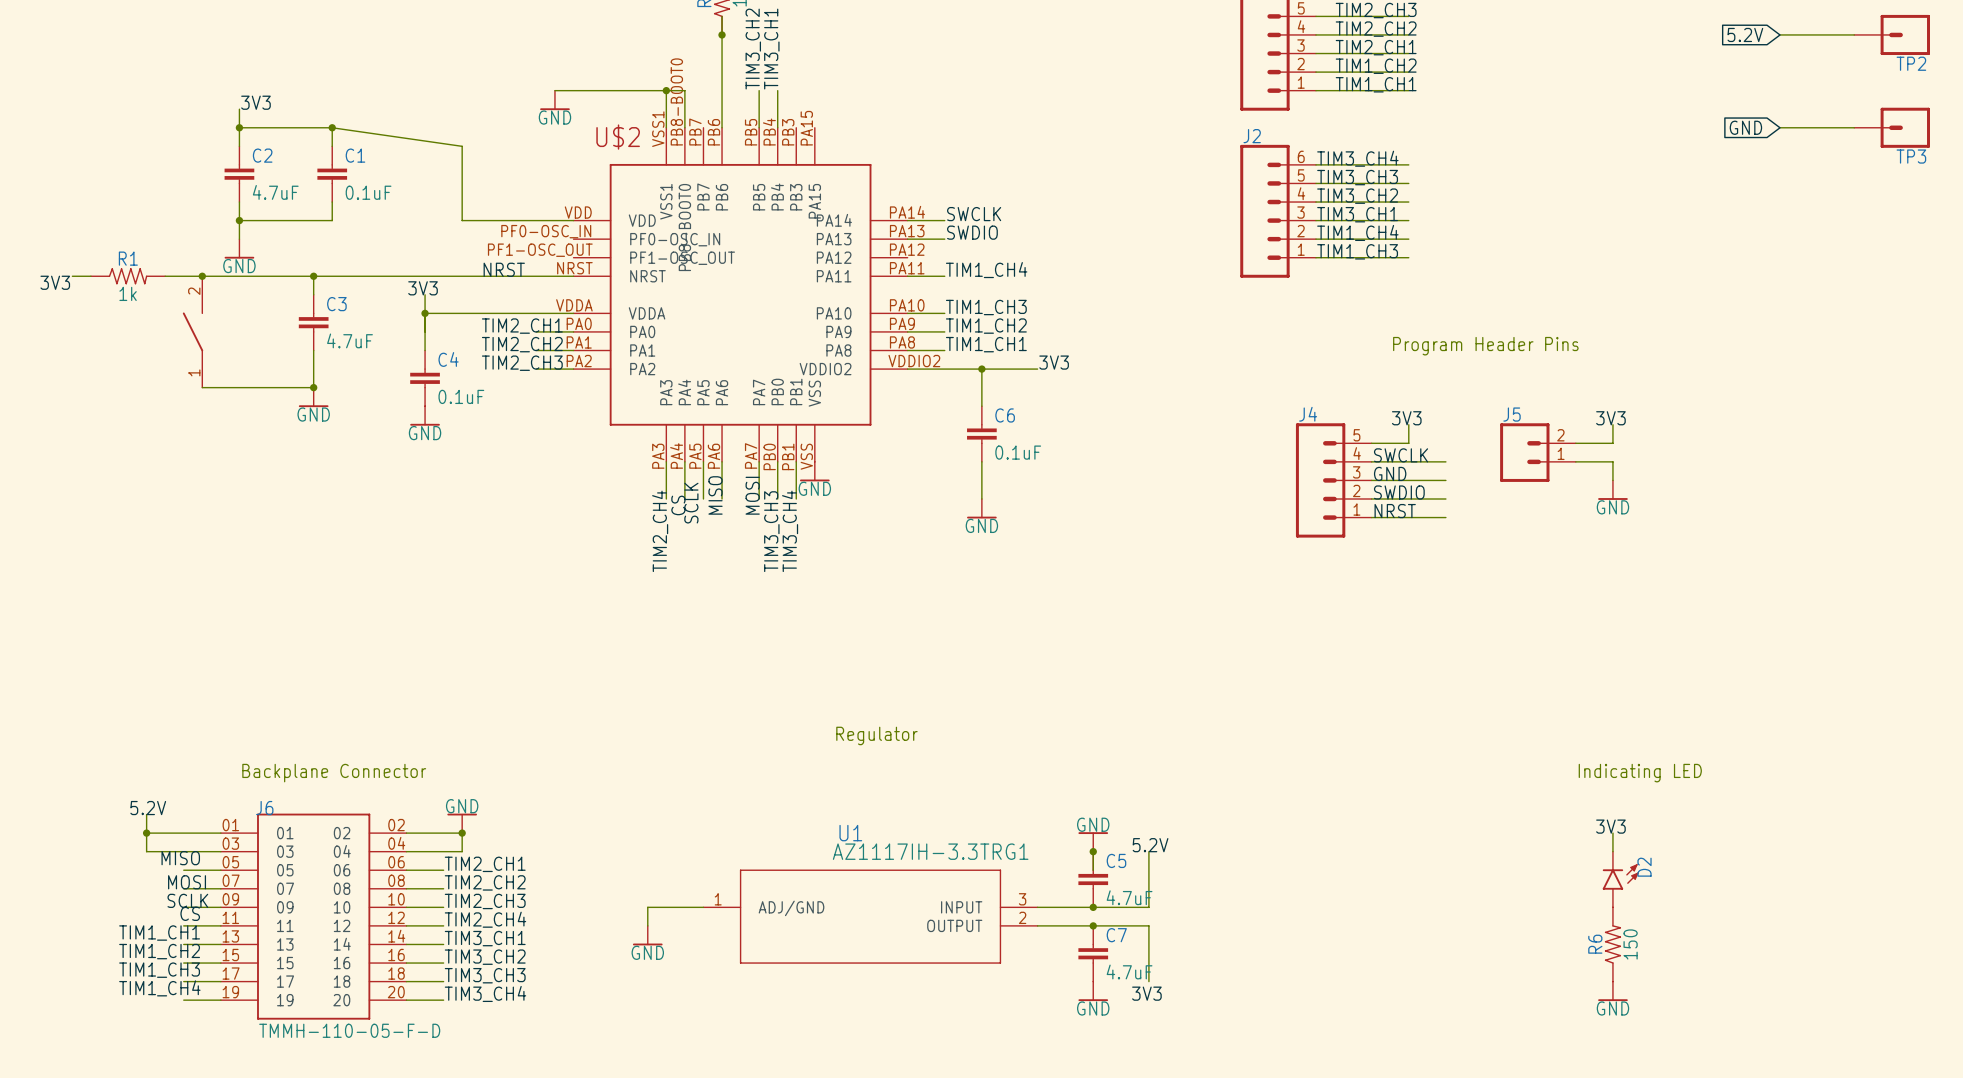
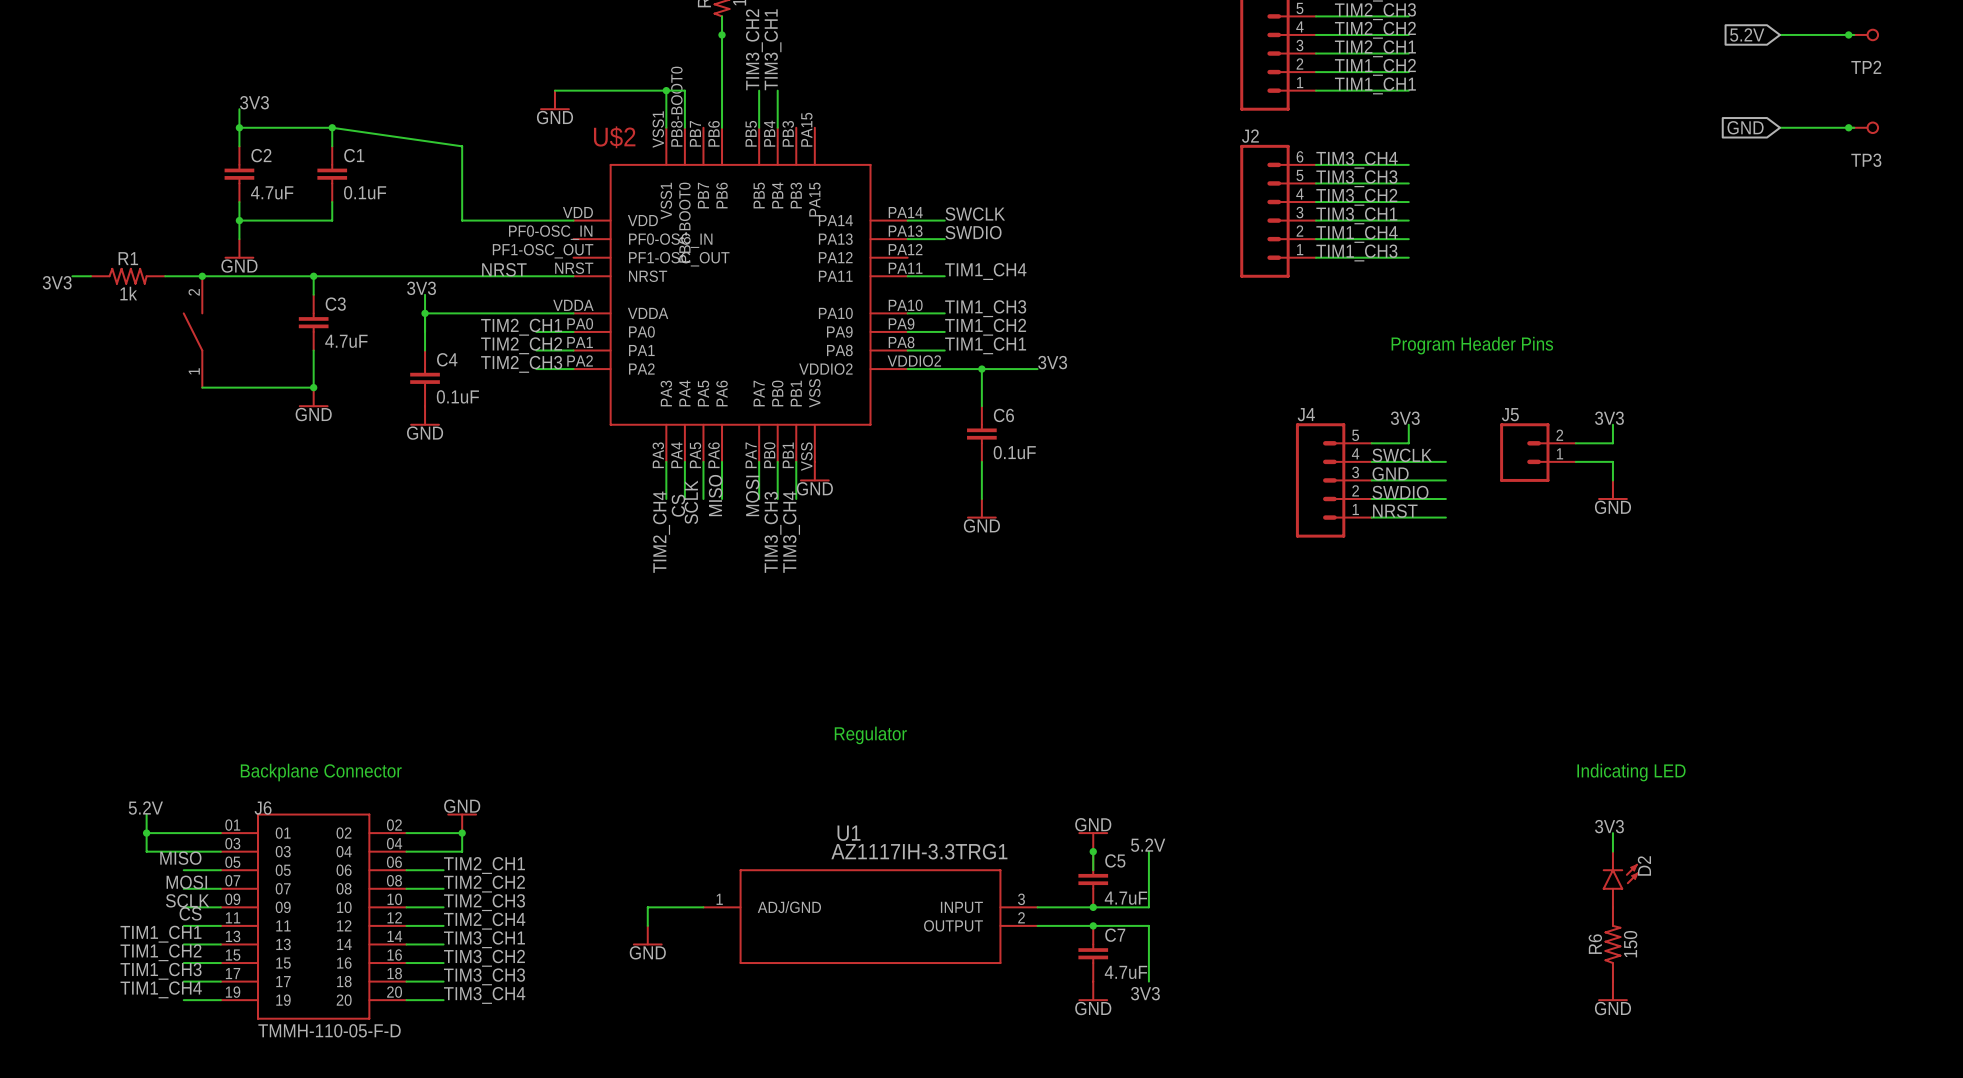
TP2 symbol: [1854, 14, 1930, 56] -> [1848, 28, 1879, 42]
junction: none -> (1848, 34)
TP2 name position: TP2 (1911, 63) -> TP2 (1866, 67)
TP3 symbol: [1854, 107, 1930, 148] -> [1848, 121, 1879, 134]
junction: none -> (1848, 127)
TP3 name position: TP3 (1911, 156) -> TP3 (1866, 160)

